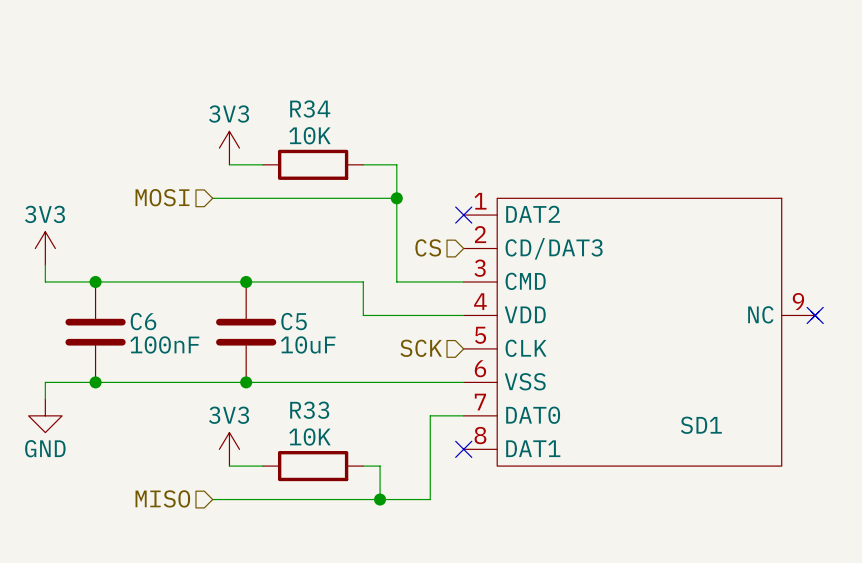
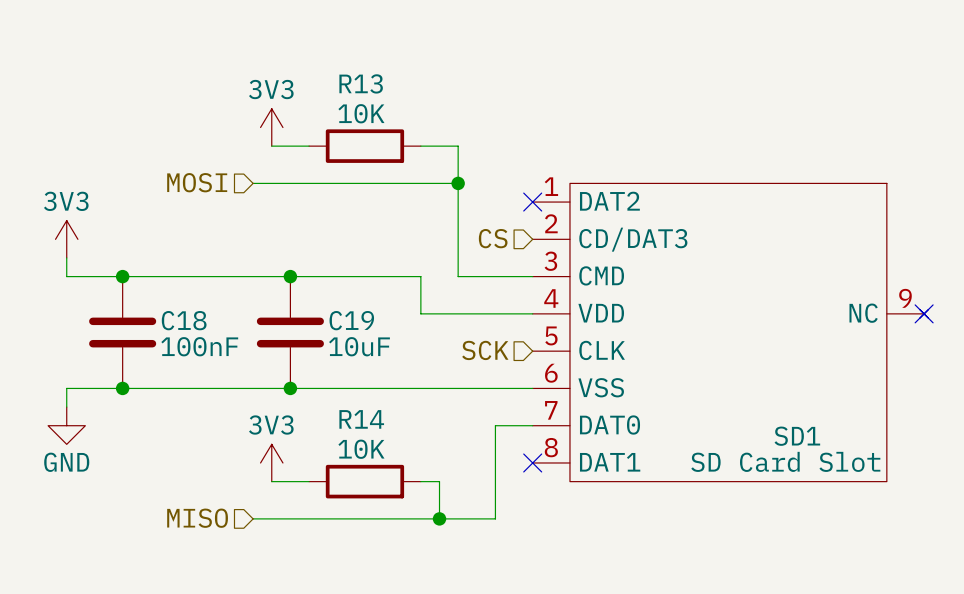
R34 name: R34 (310, 108) -> R13 (361, 83)
C6 name: C6 (143, 321) -> C18 (184, 320)
C5 name: C5 (294, 321) -> C19 (351, 320)
R33 name: R33 (309, 410) -> R14 (361, 419)
SD1 value: none -> SD Card Slot (785, 461)

